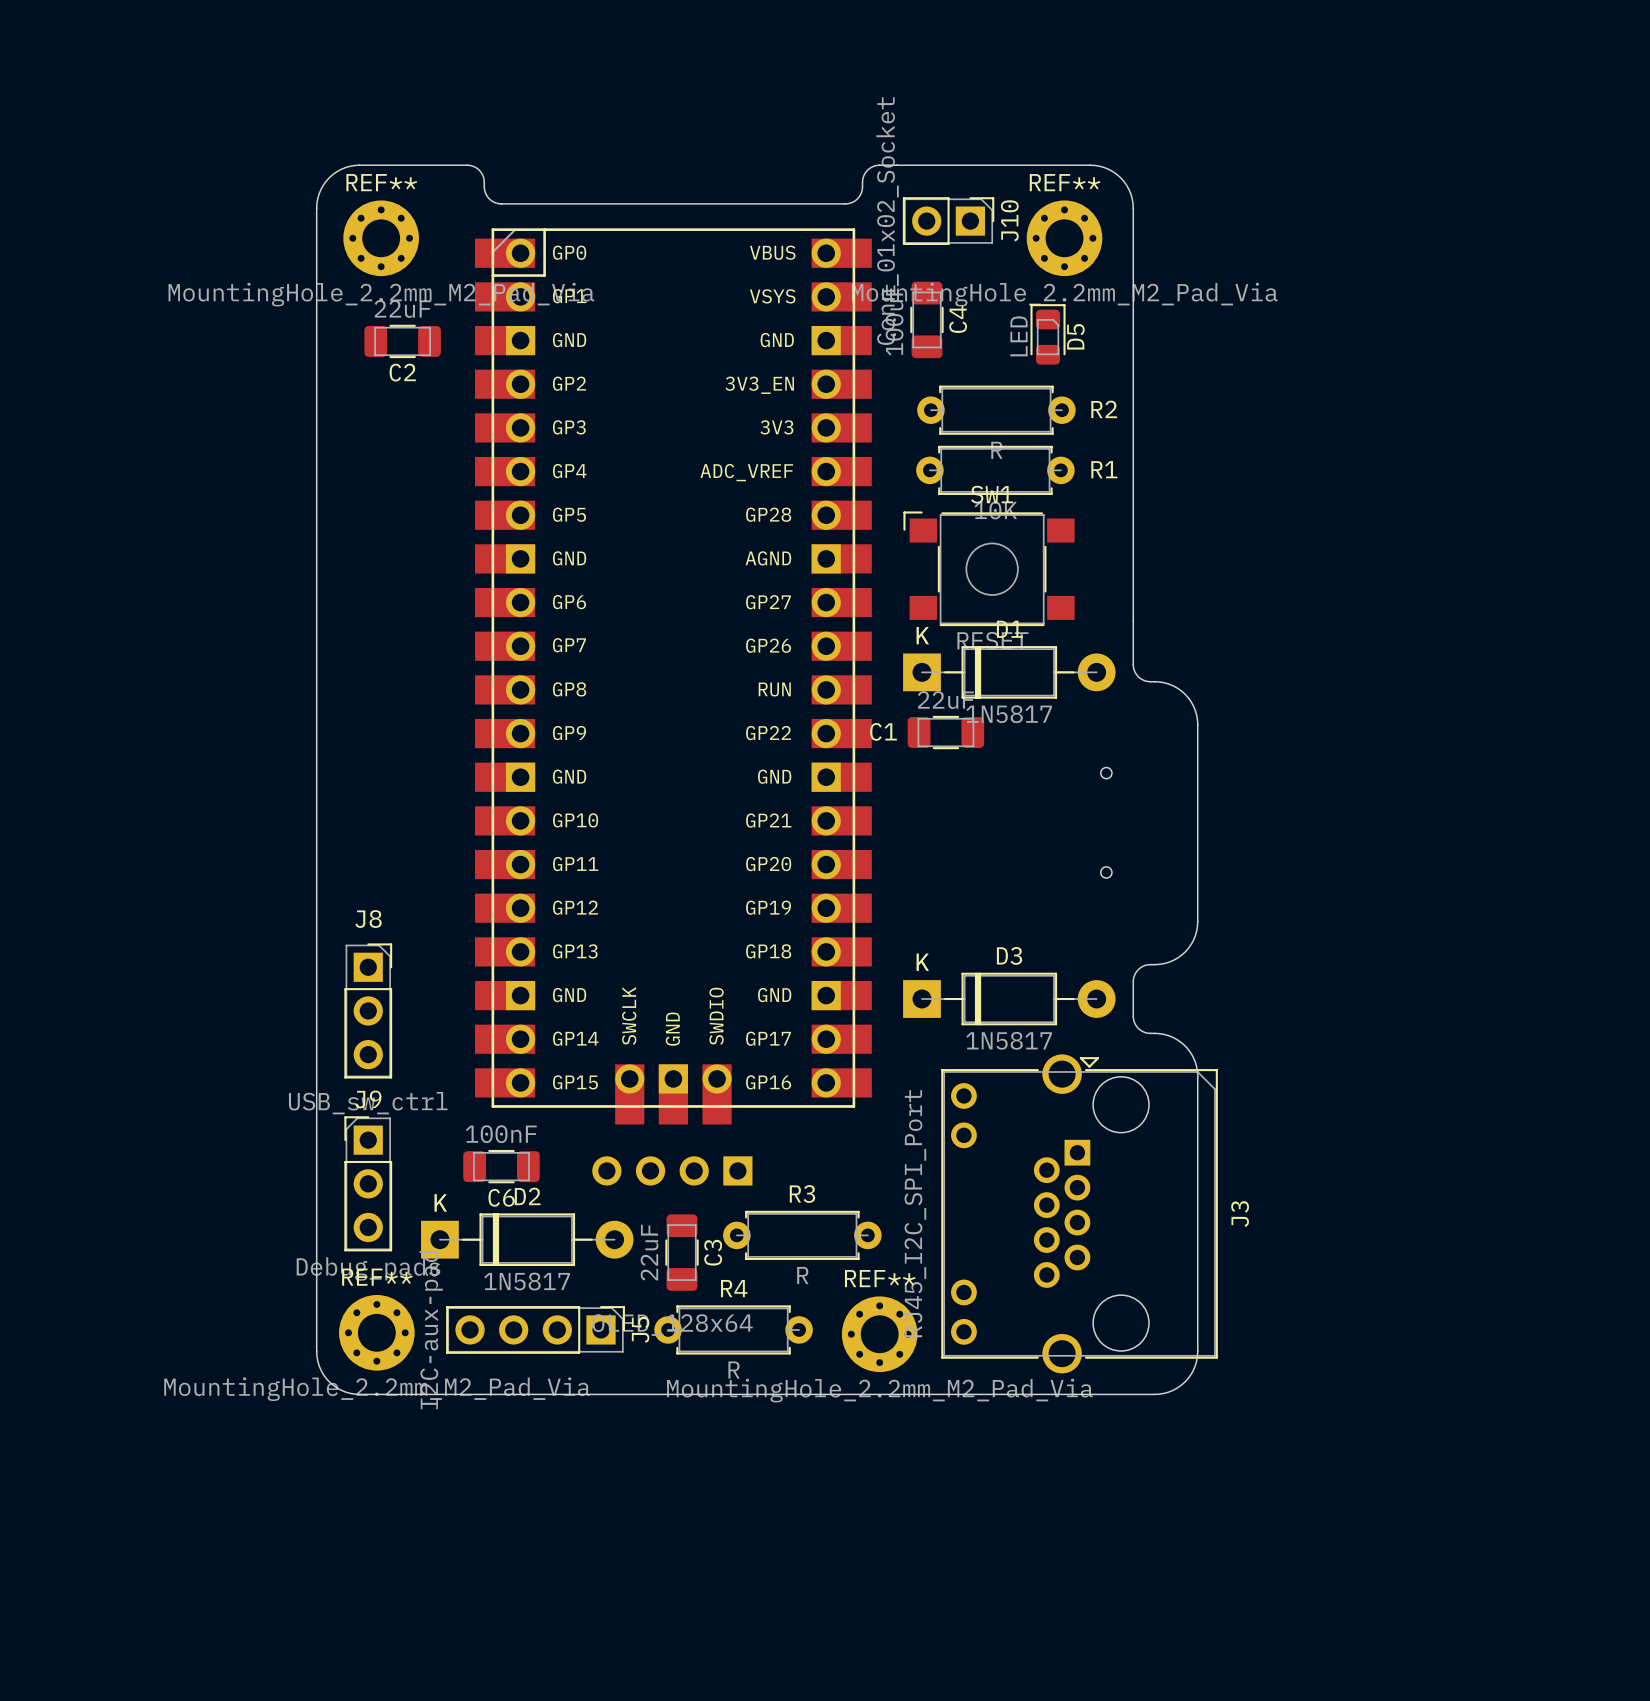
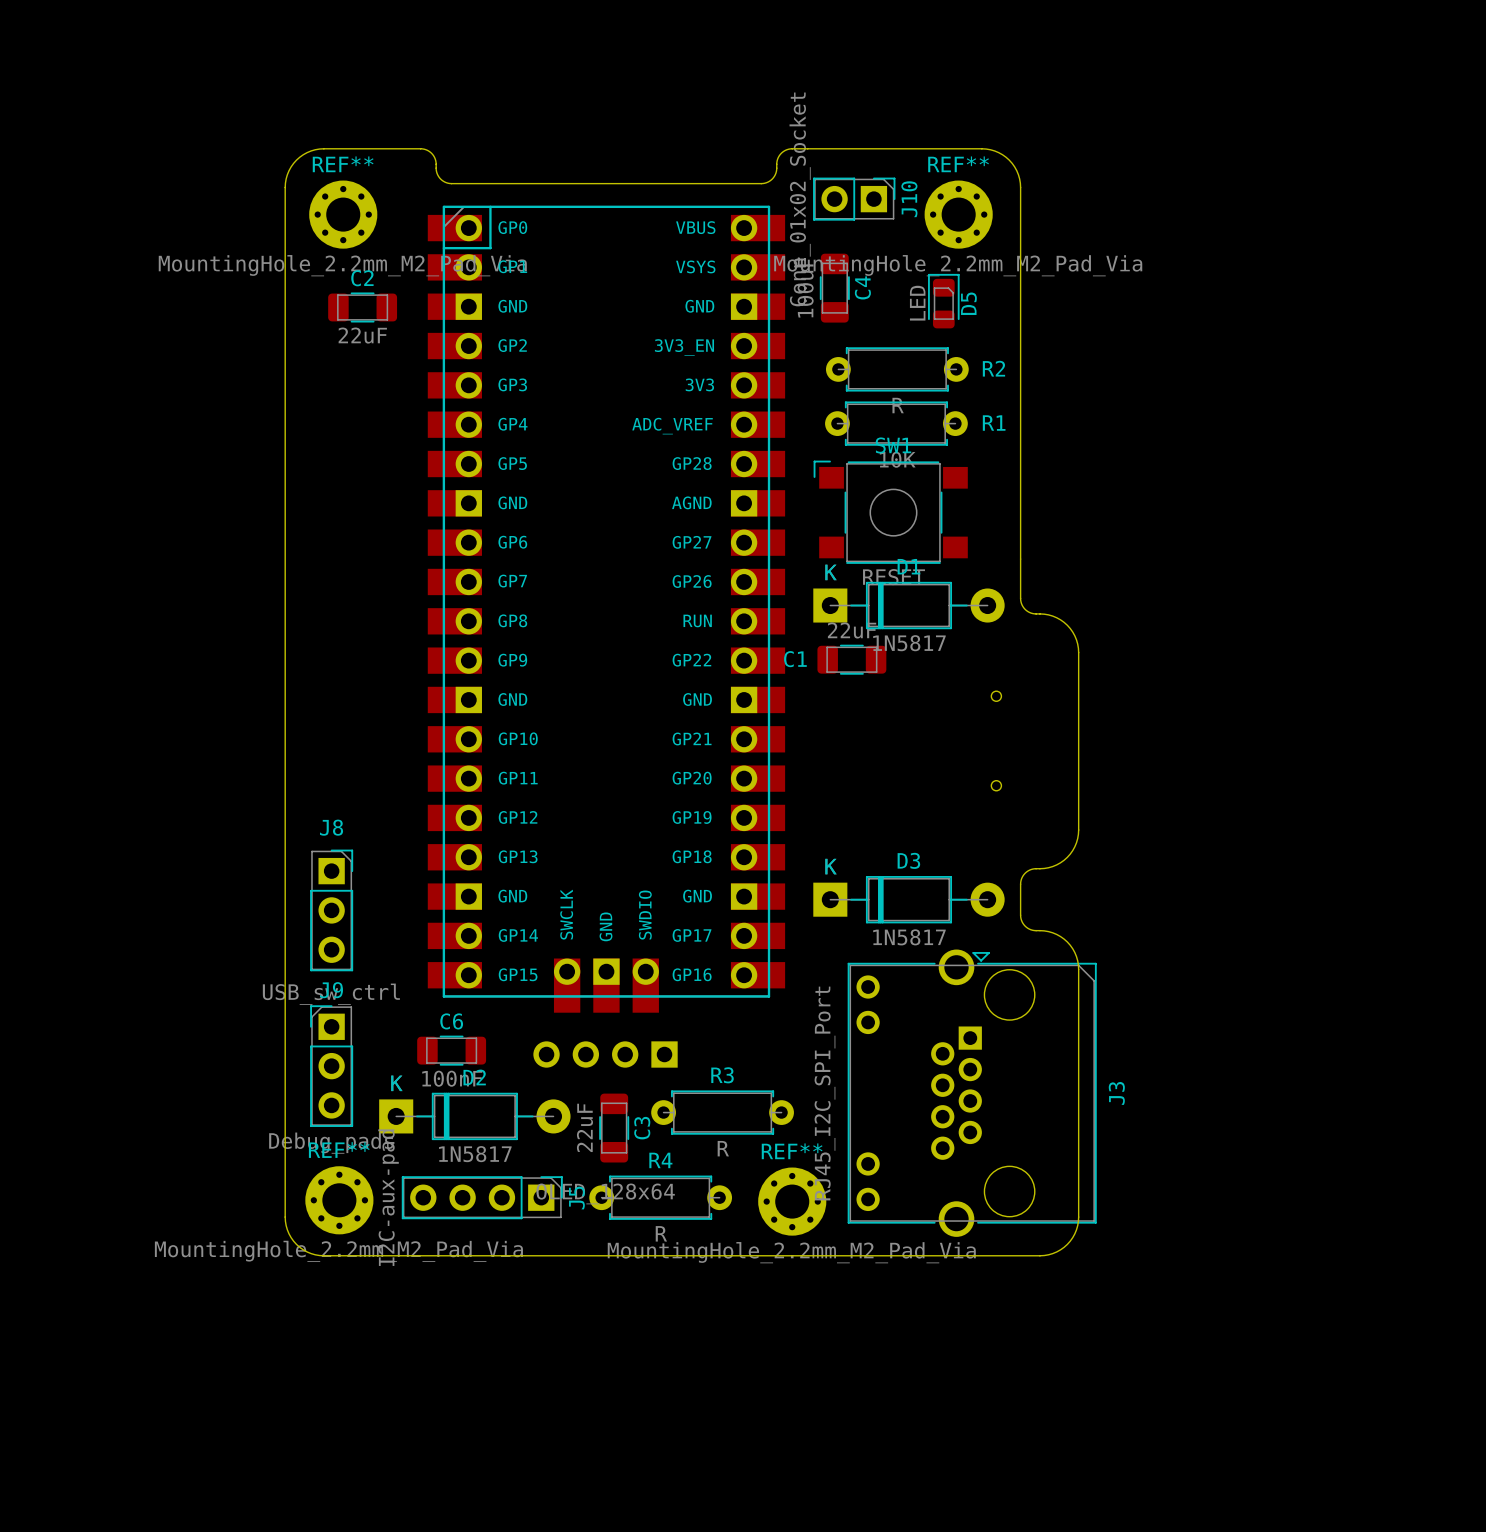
C2 value position: 22uF (402, 308) -> 22uF (362, 335)
C2 name position: C2 (402, 372) -> C2 (362, 278)
C6 value position: 100nF (501, 1134) -> 100nF (452, 1078)
C6 name position: C6 (501, 1197) -> C6 (451, 1021)

